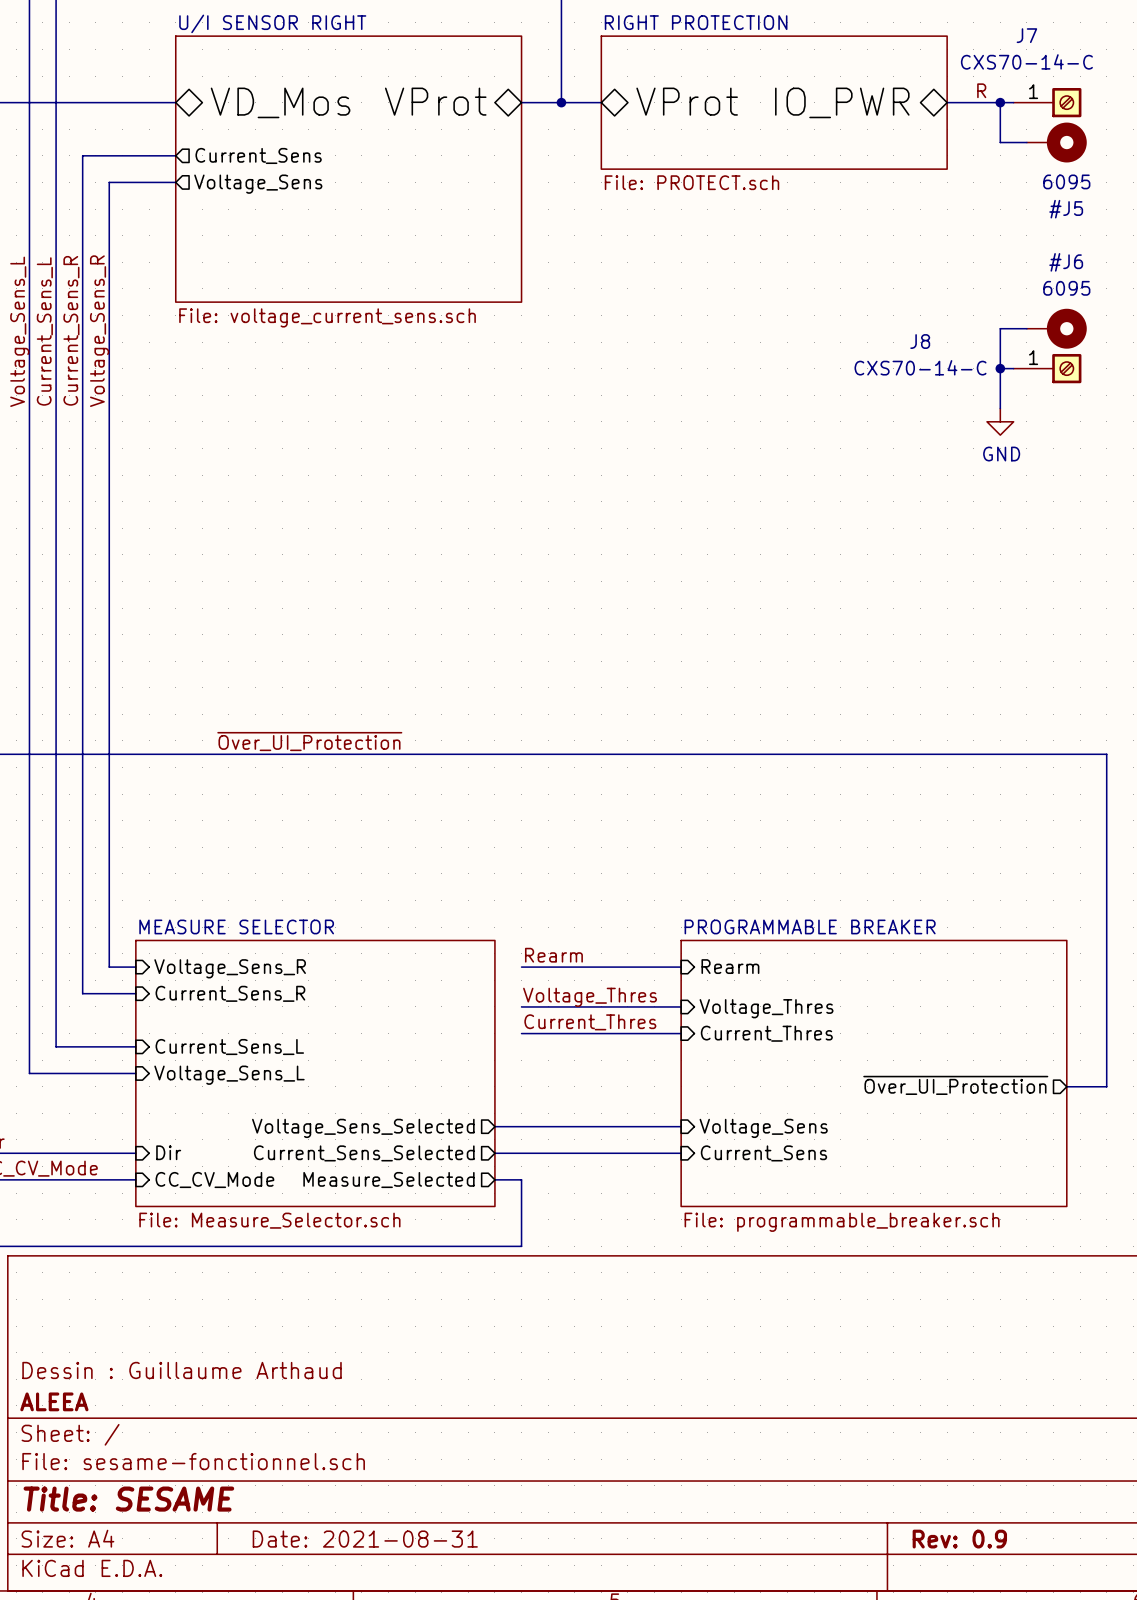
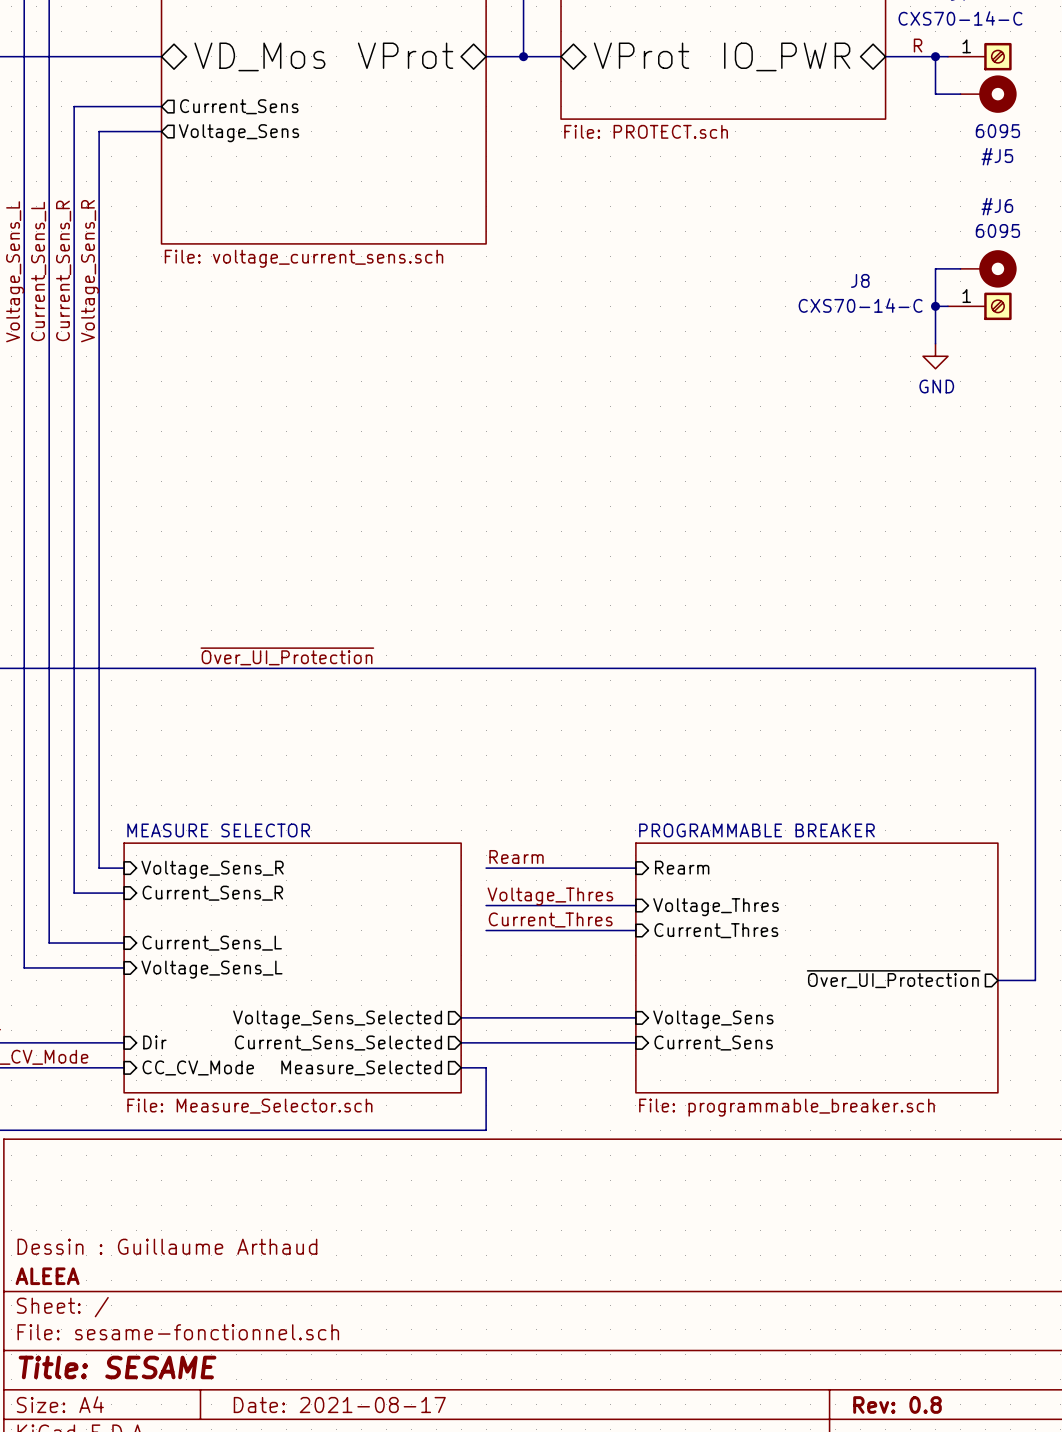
title block: Date: 2021-08-31 (365, 1539) -> Date: 2021-08-17 (339, 1405)
title block: Rev: 0.9 (959, 1539) -> Rev: 0.8 (897, 1405)

